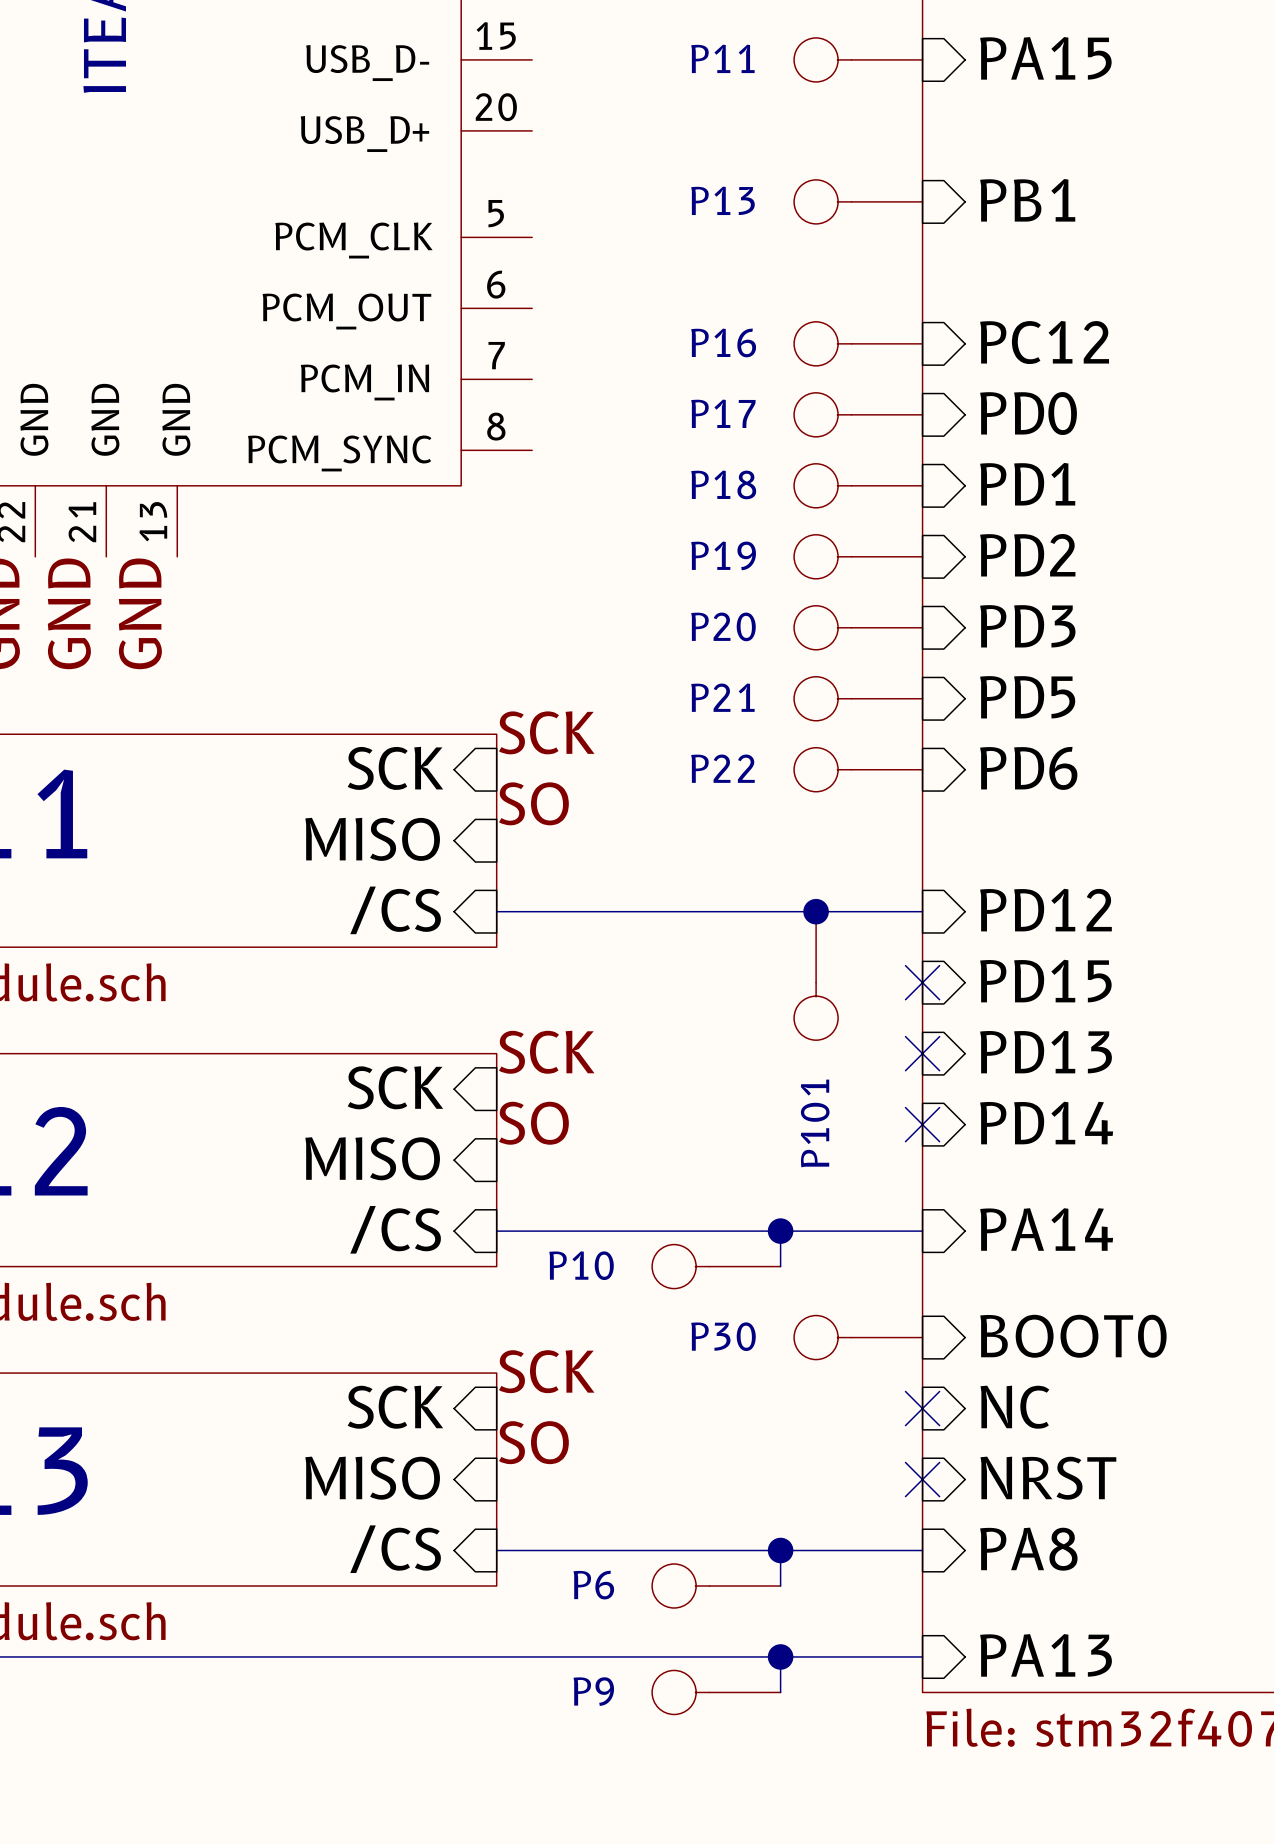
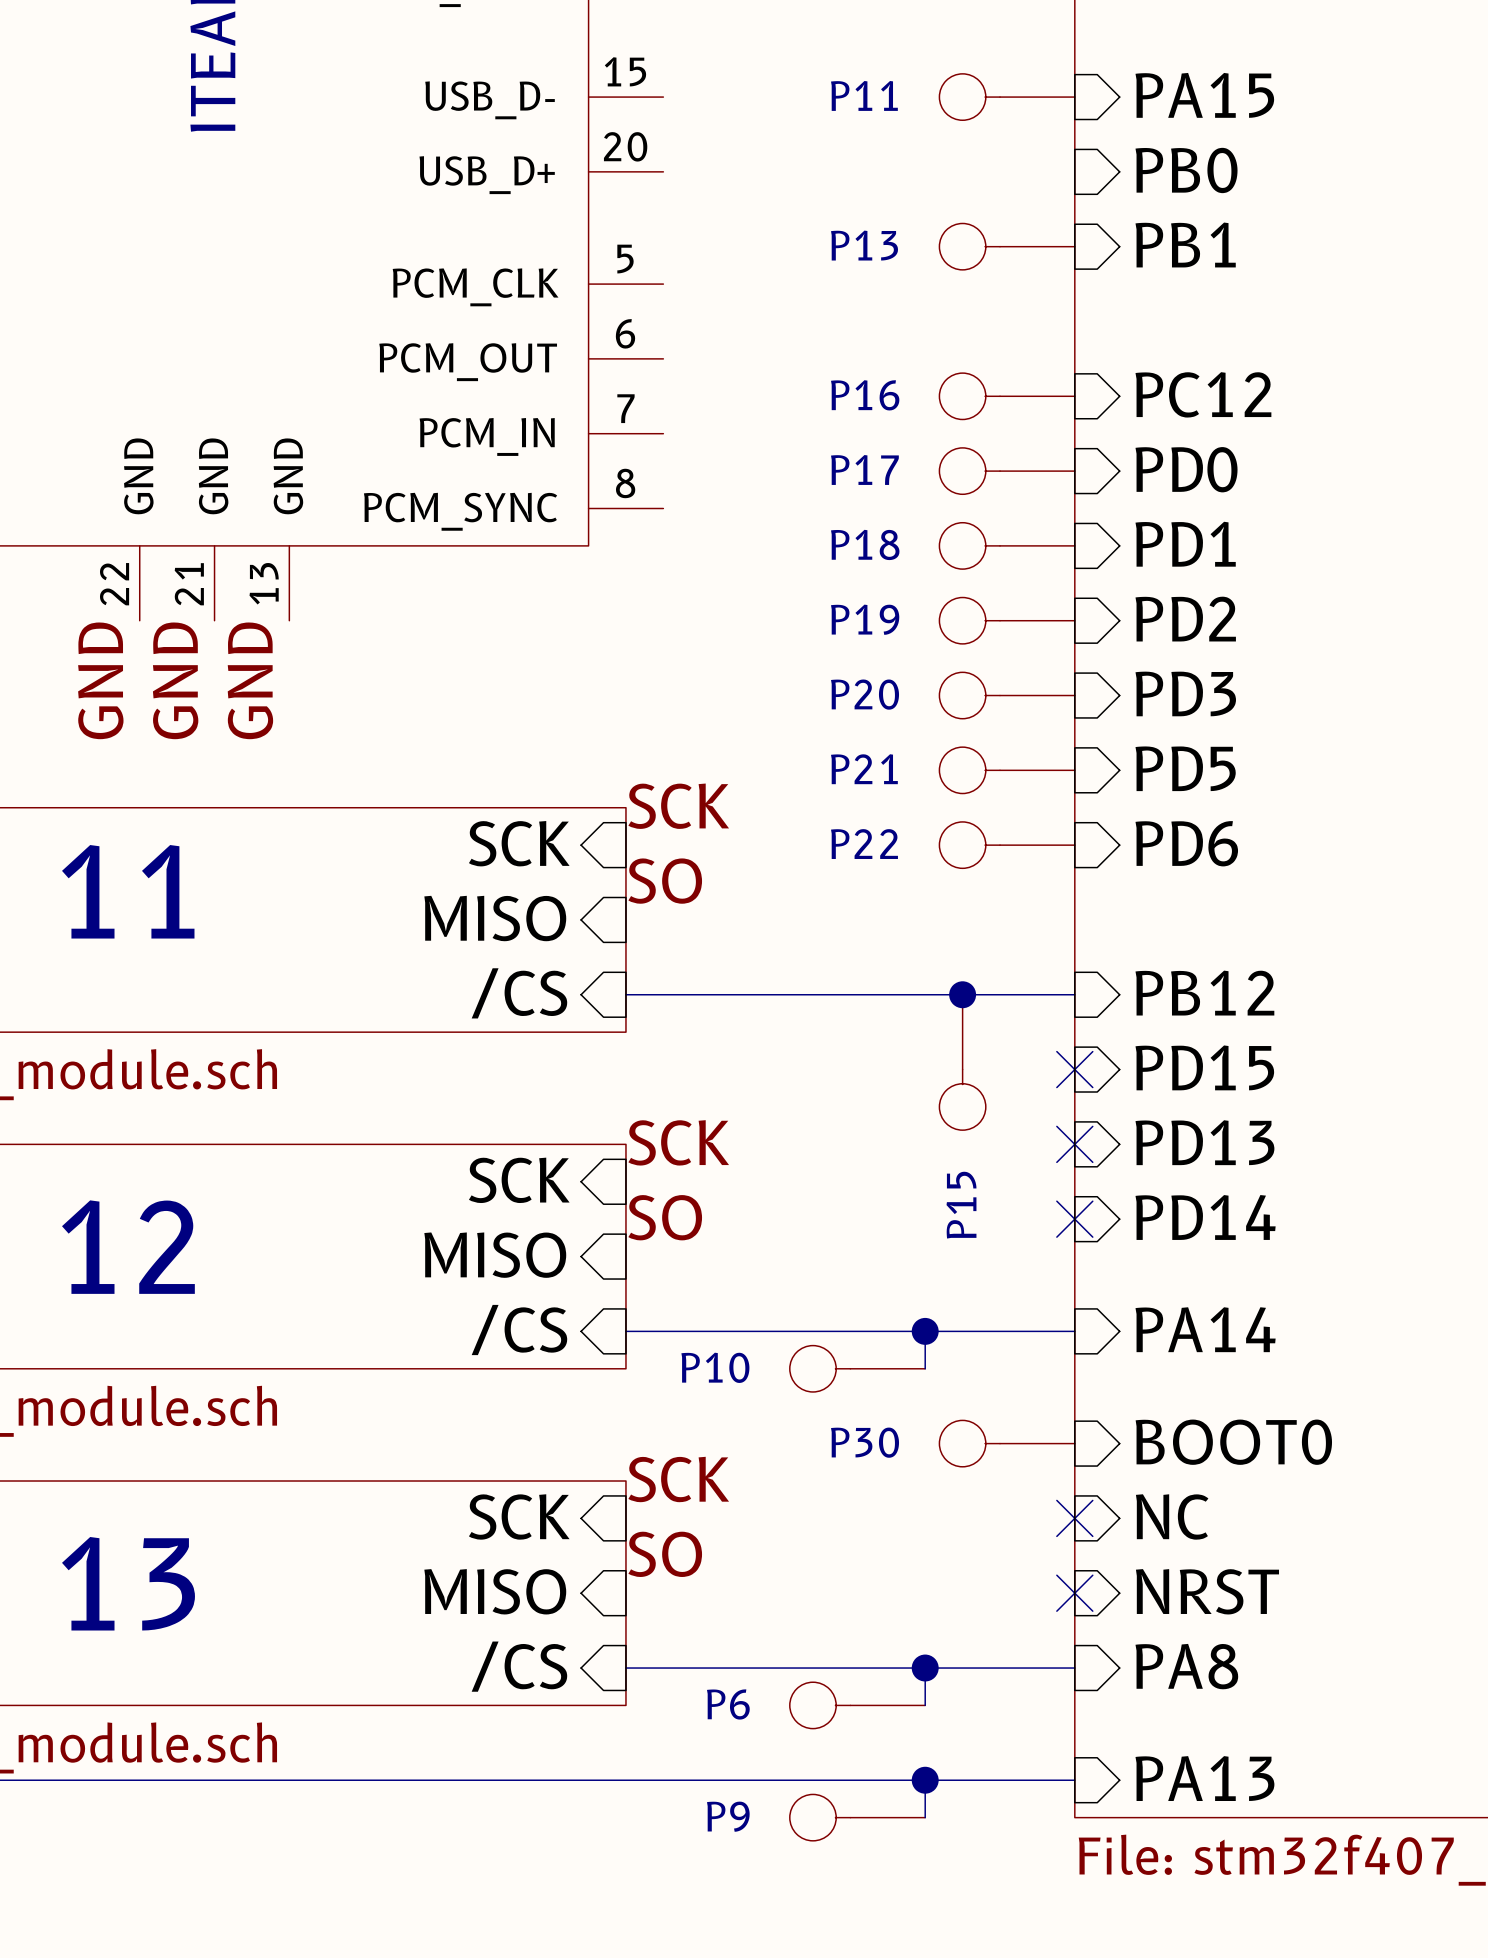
sheet pin: none -> PB0 (1186, 170)
sheet pin: PD12 (1045, 910) -> PB12 (1204, 993)
P101 name: P101 (815, 1123) -> P15 (961, 1205)

